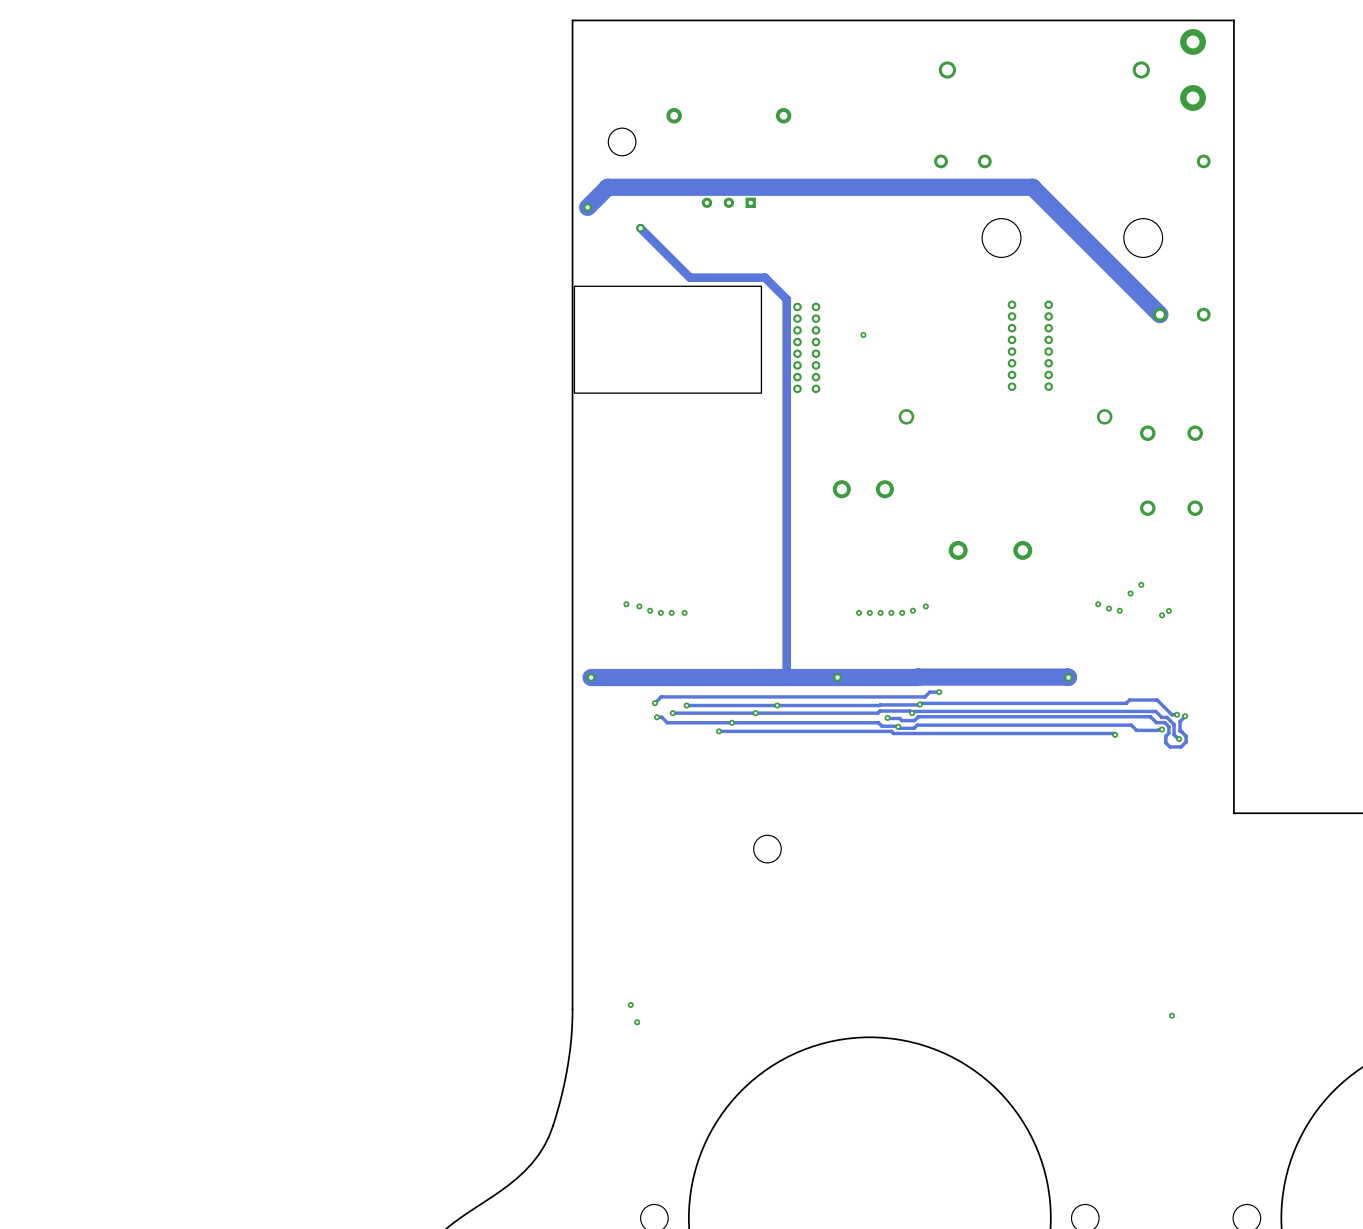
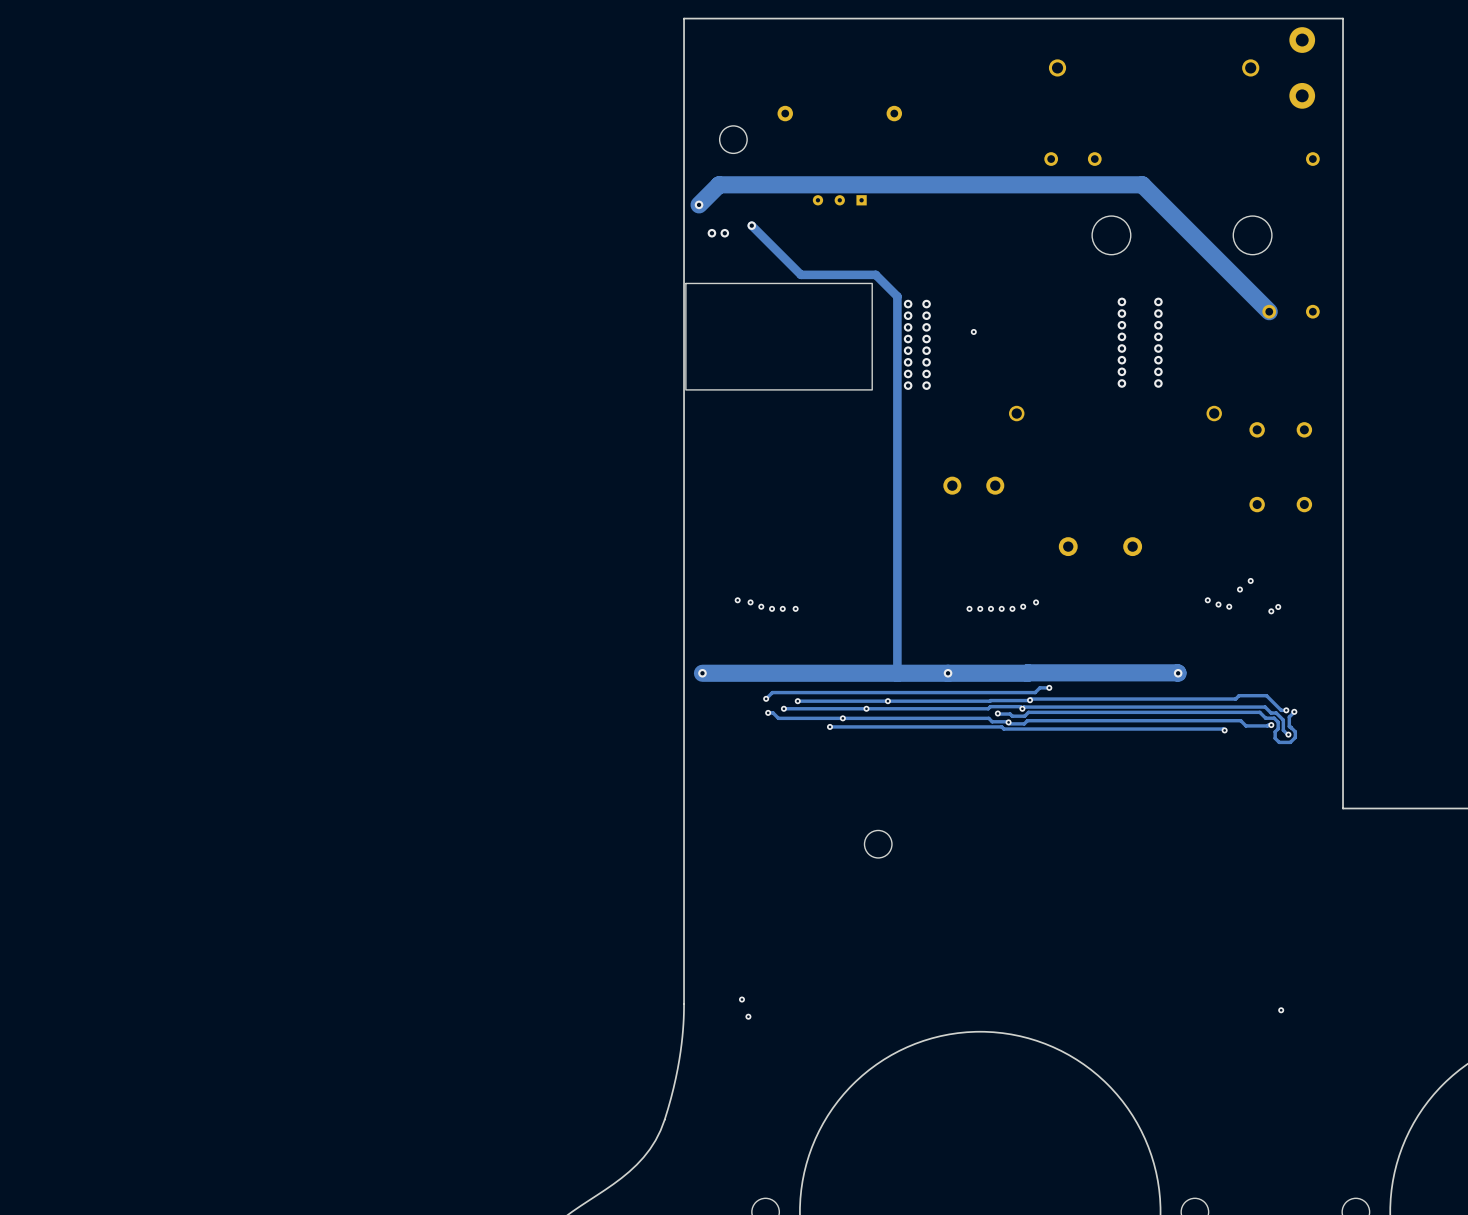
via: none -> (711, 233)
via: none -> (724, 233)

